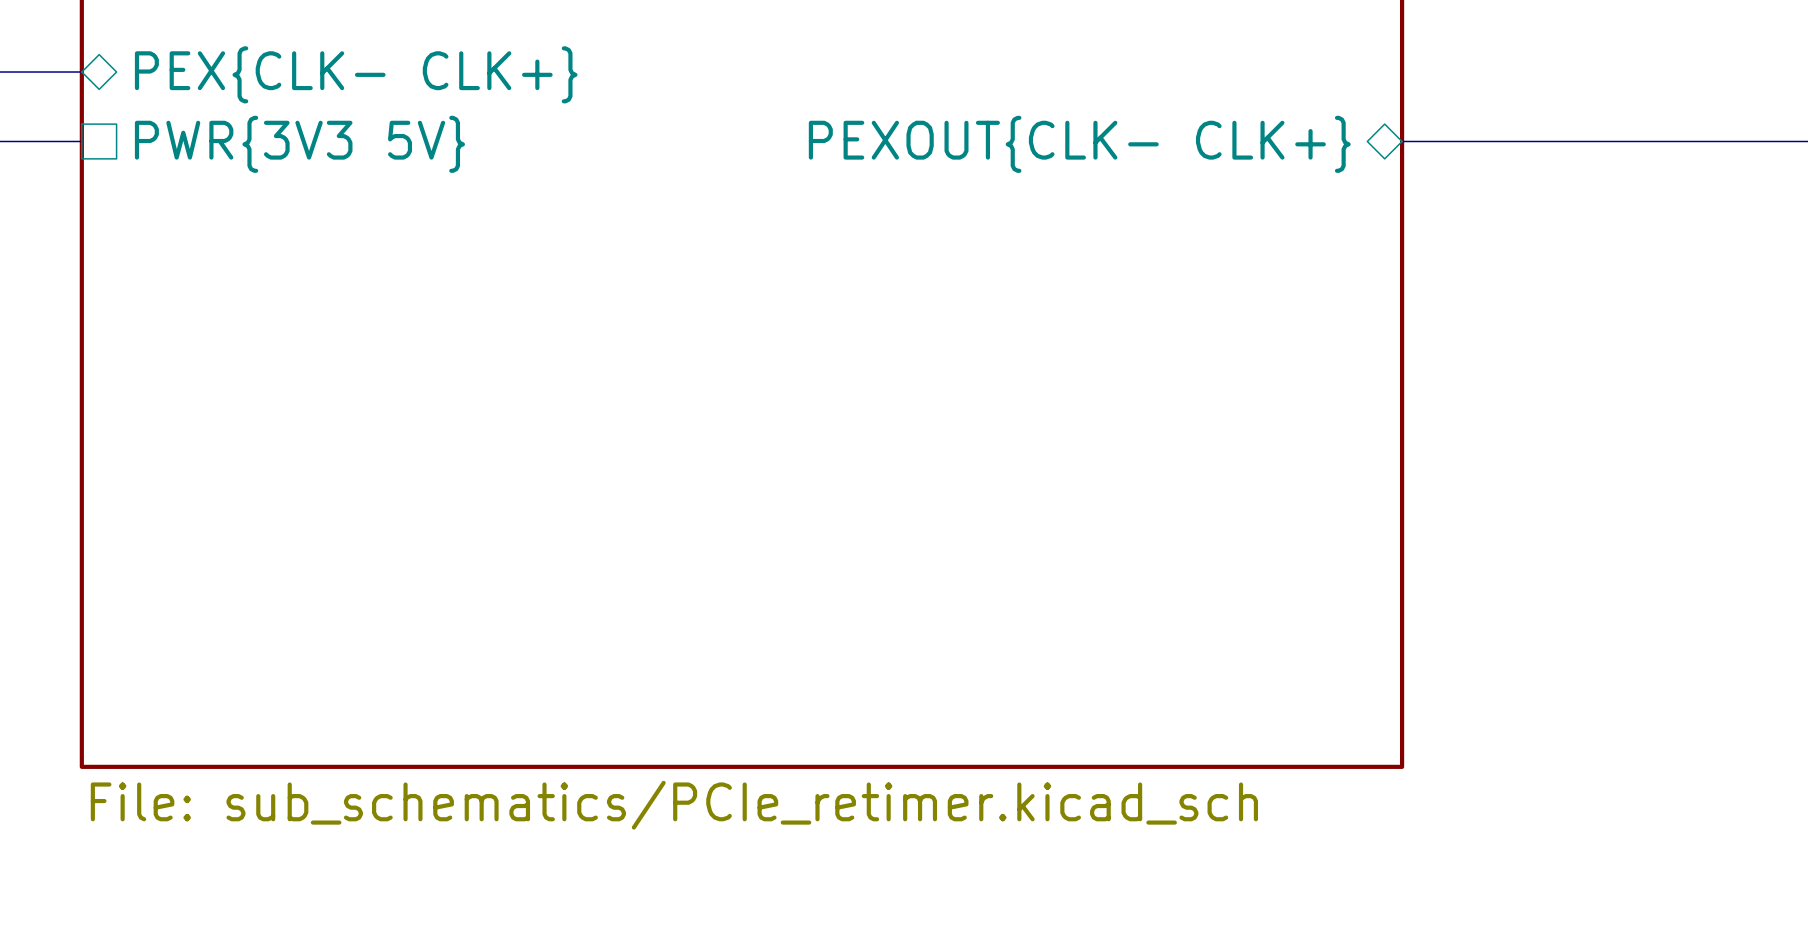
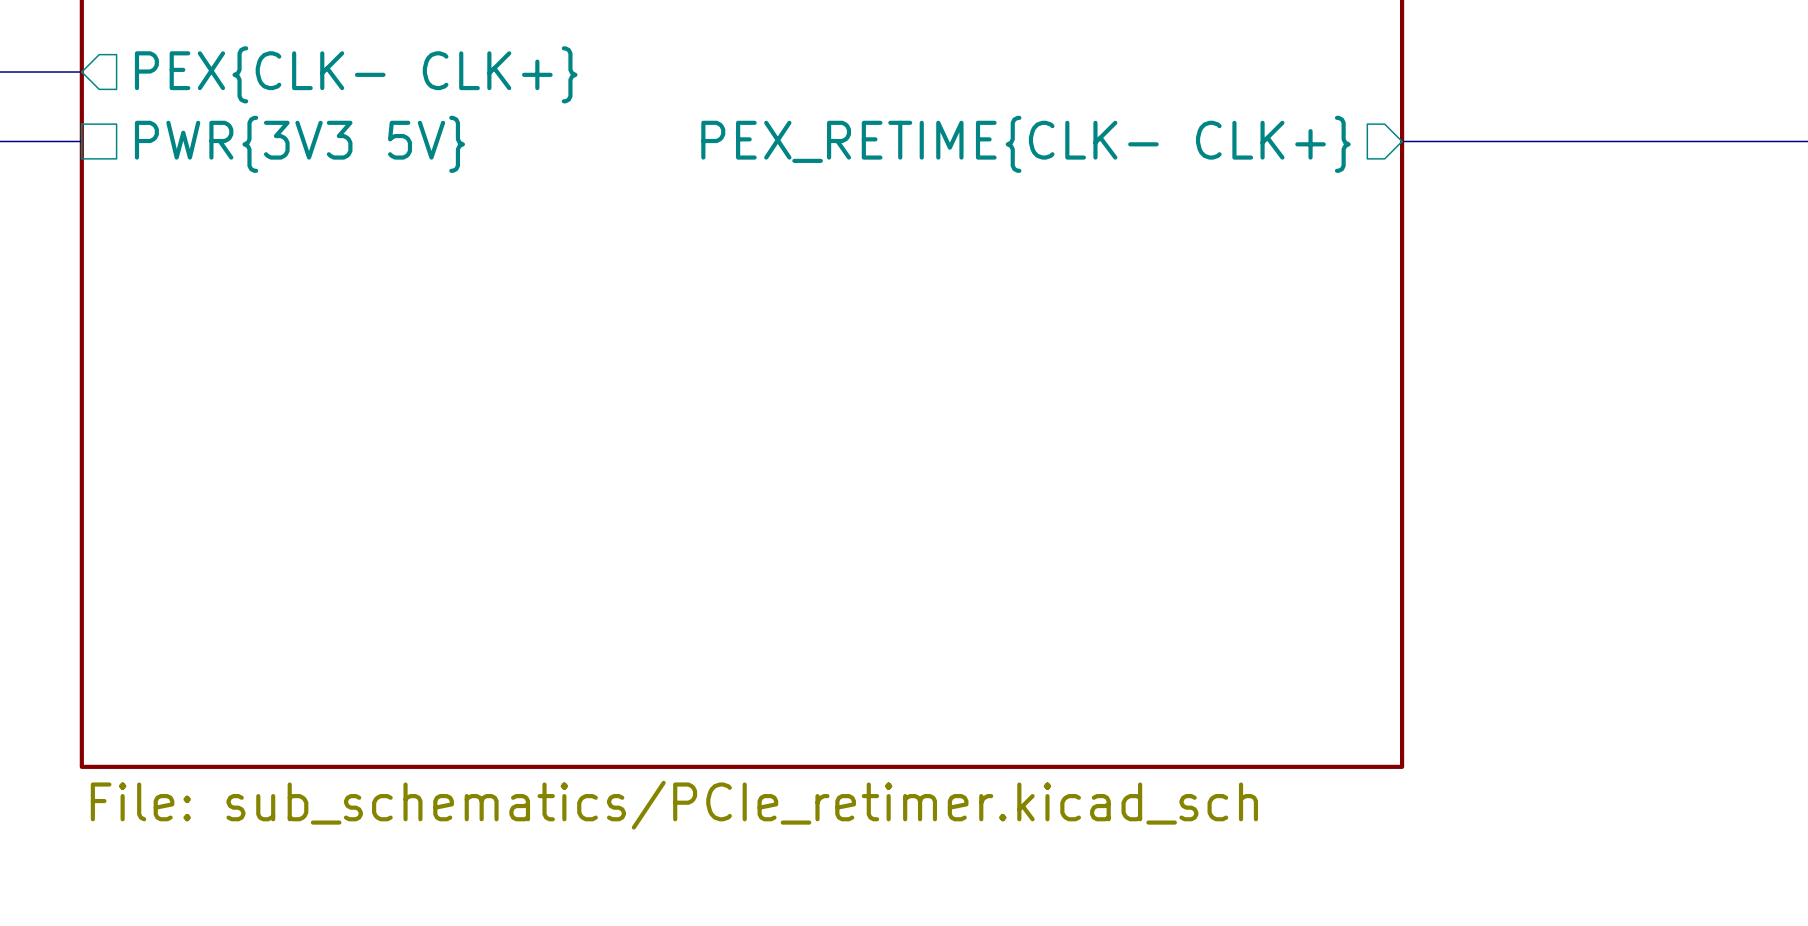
sheet pin shape: bidirectional (356, 74) -> output (356, 74)
sheet pin shape: bidirectional (1079, 144) -> output (1025, 144)
sheet pin: PEXOUT{CLK- CLK+} (1079, 144) -> PEX_RETIME{CLK- CLK+} (1025, 144)

